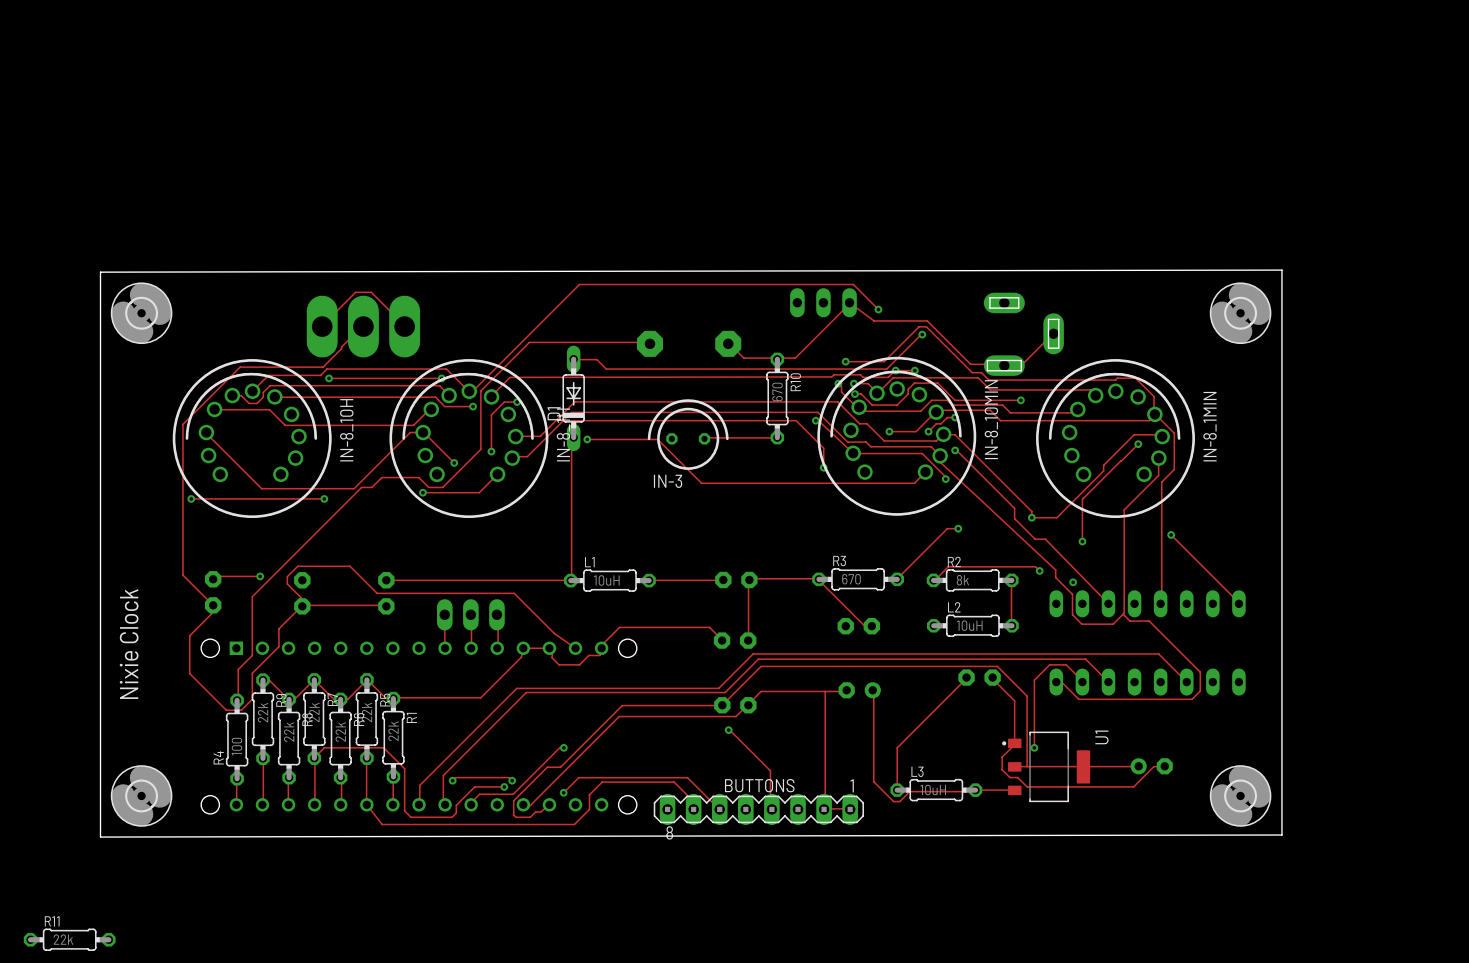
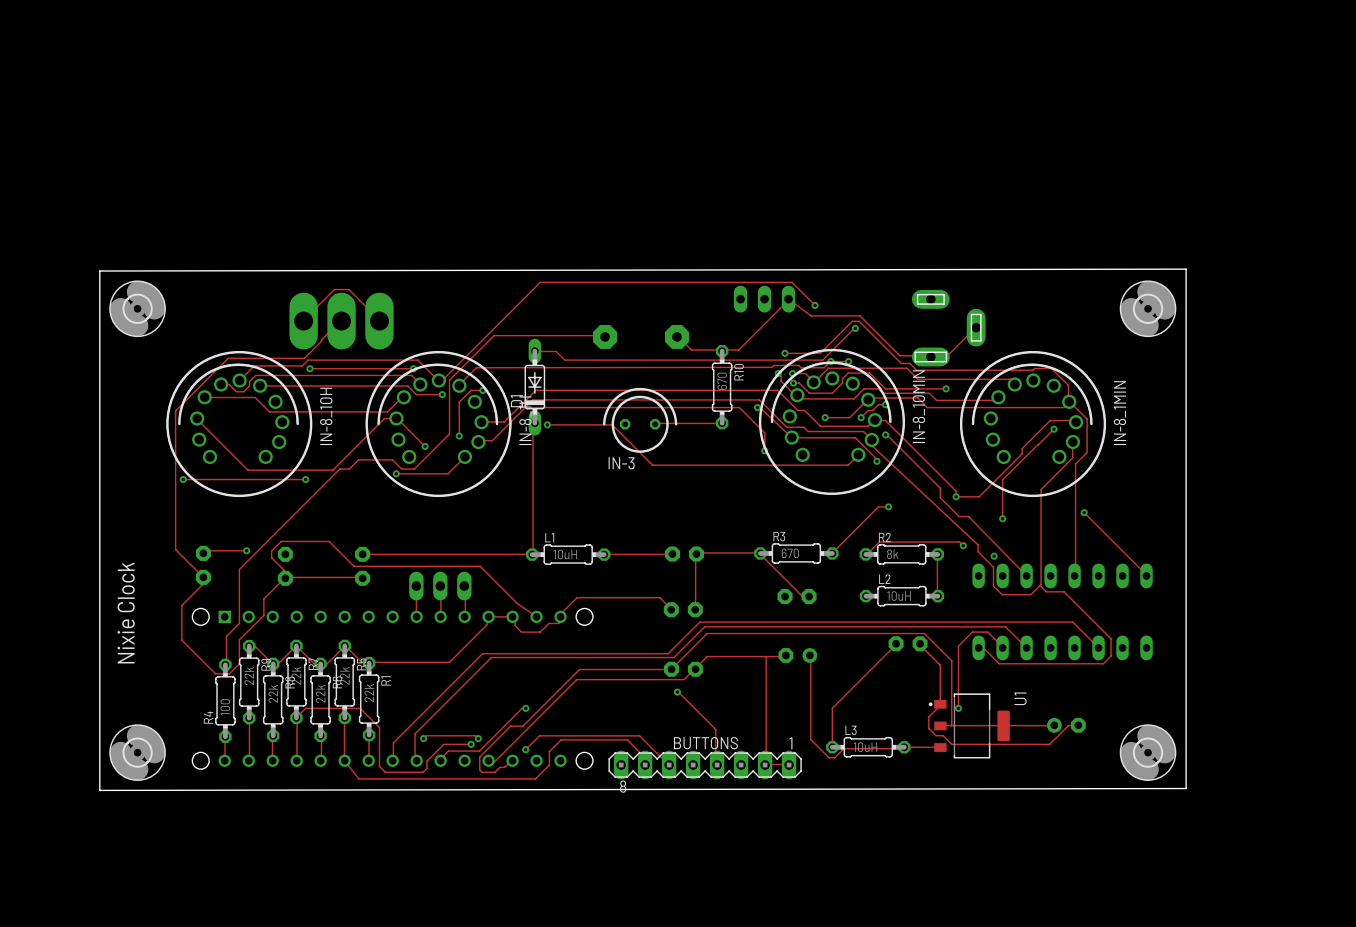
R11: 22k (69, 939) -> none

